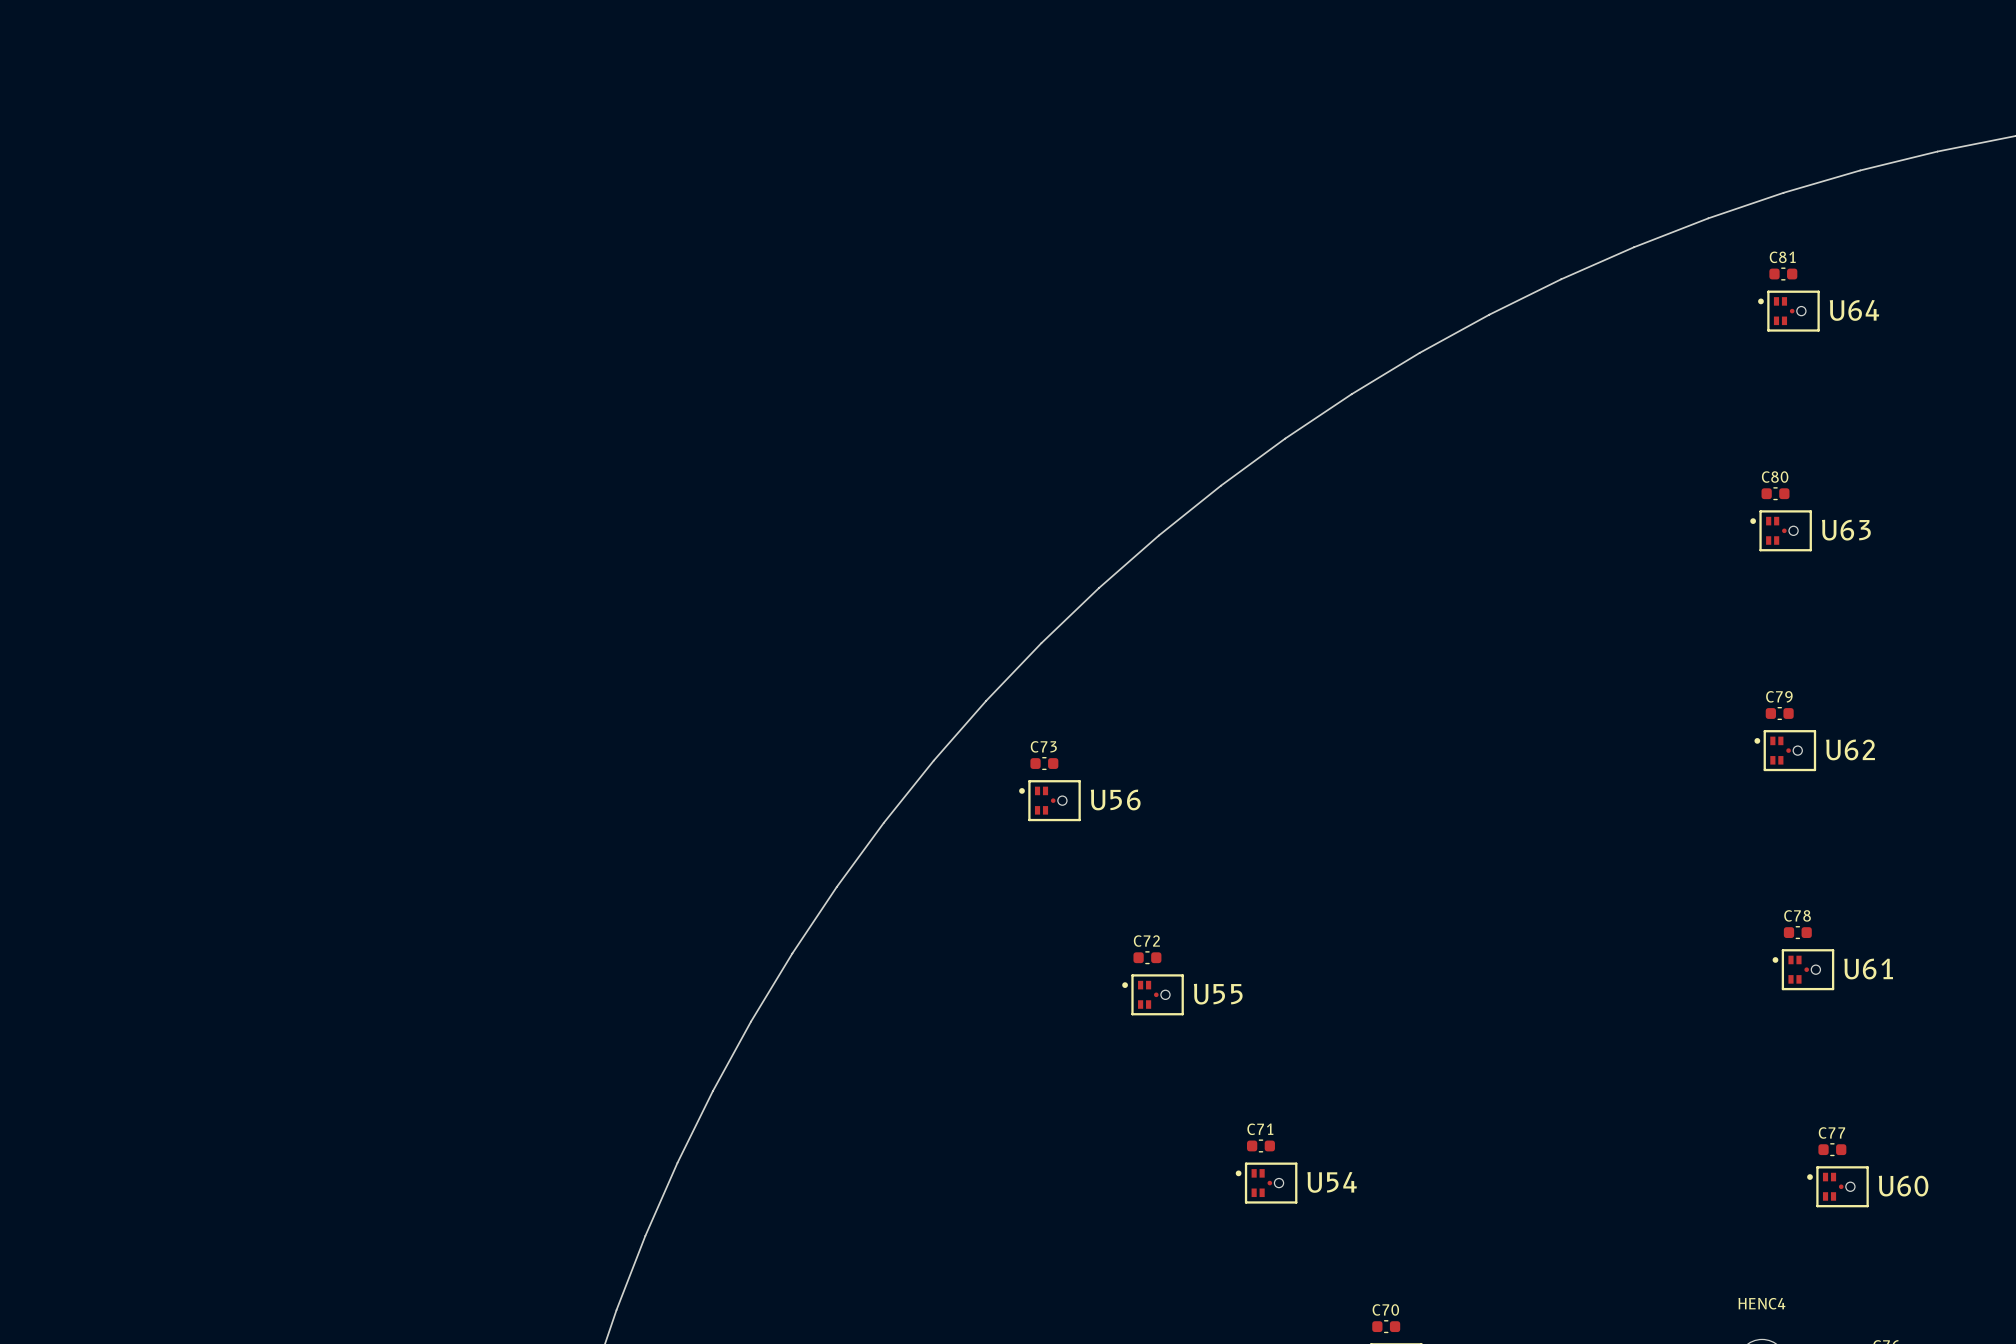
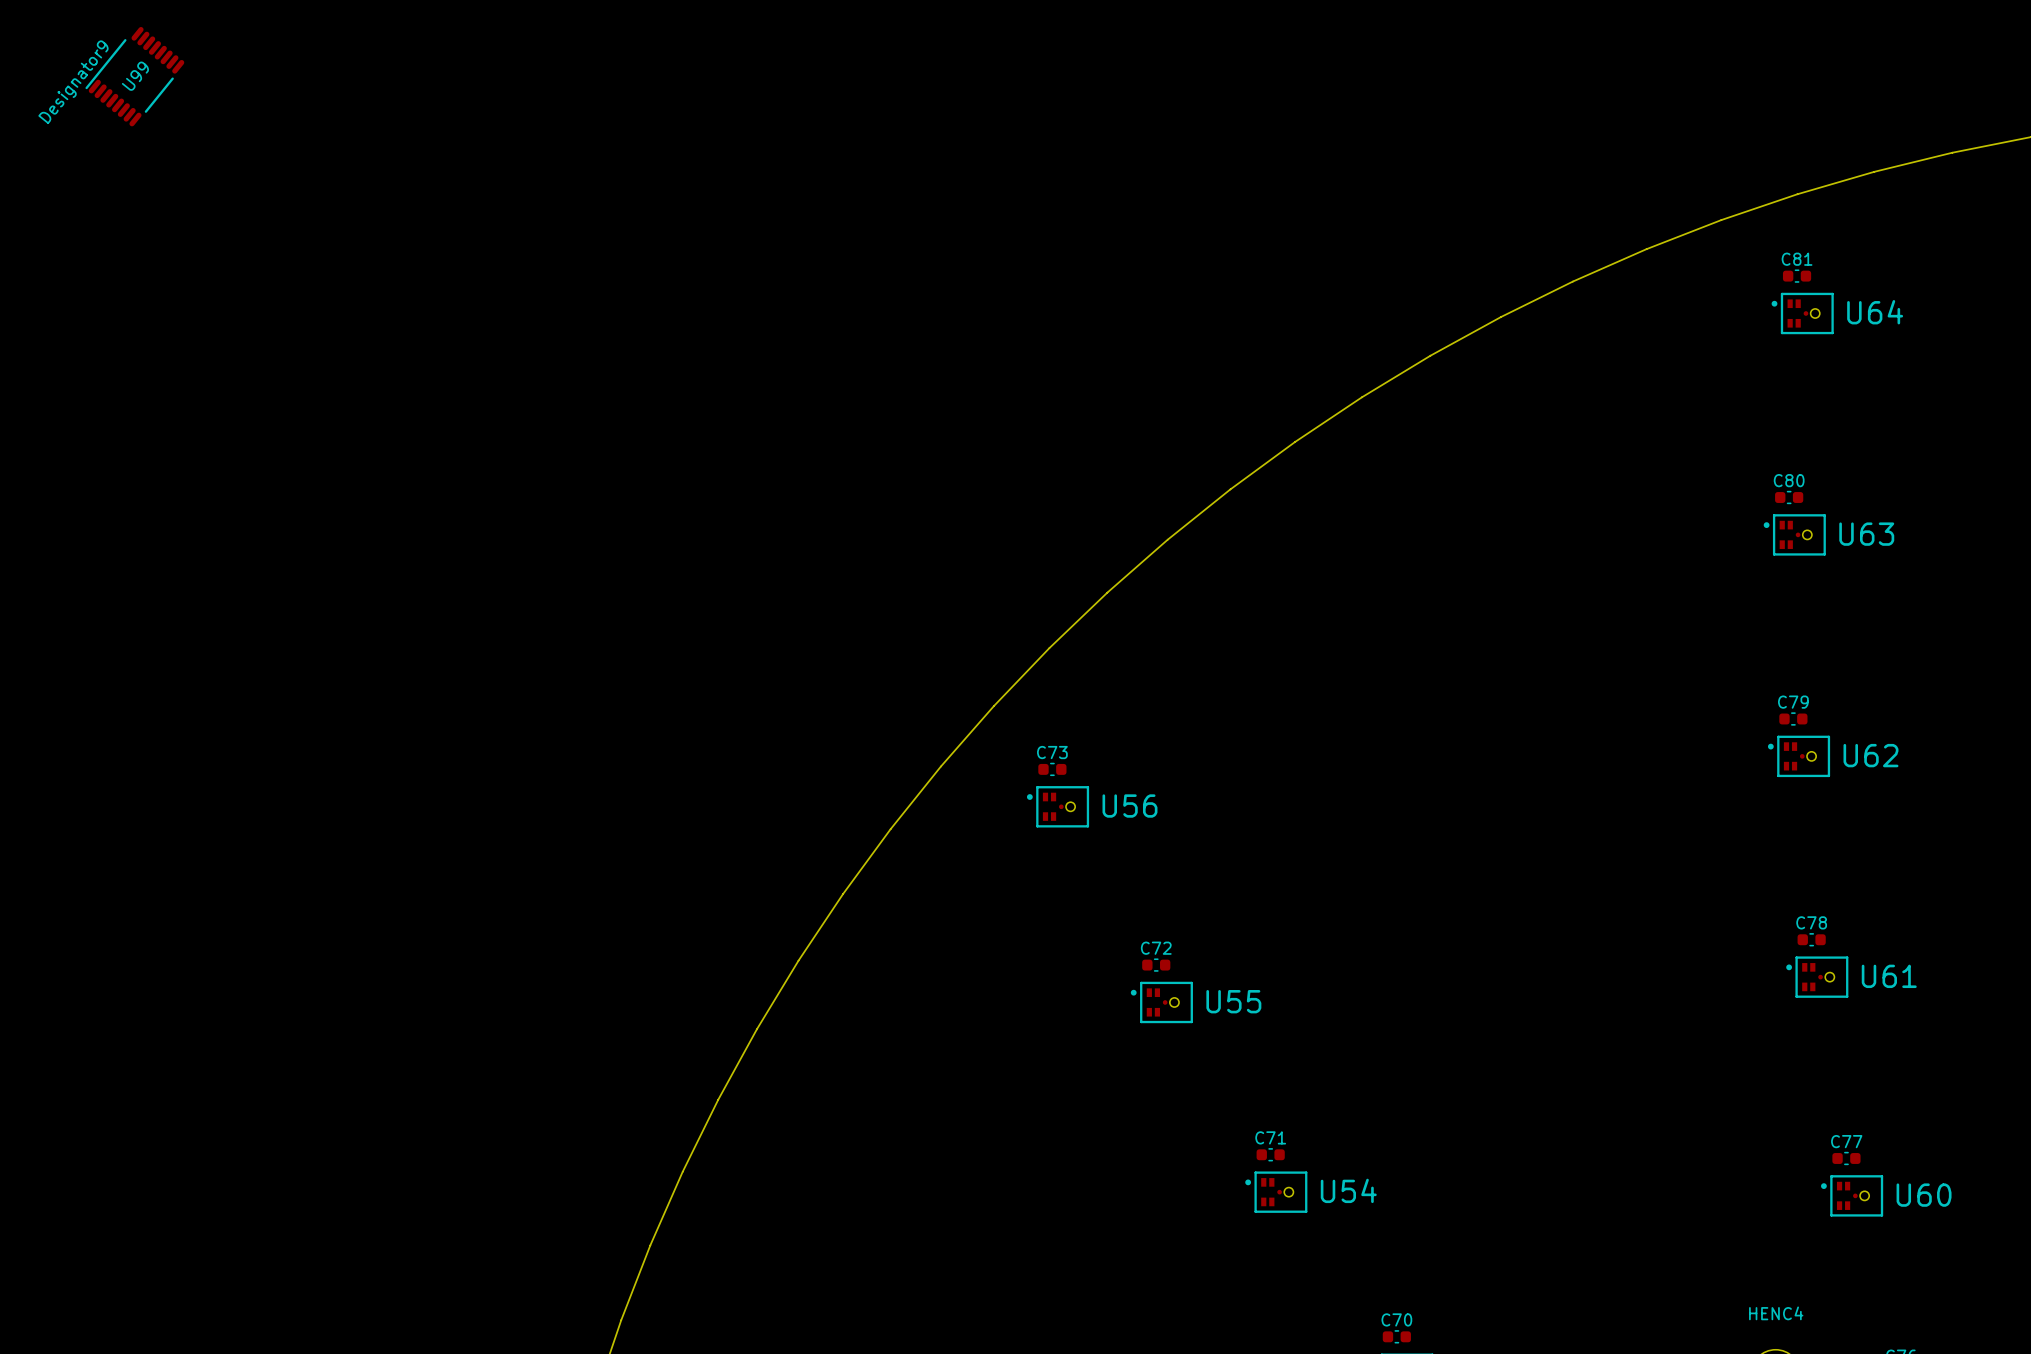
U99: none -> (134, 76)

